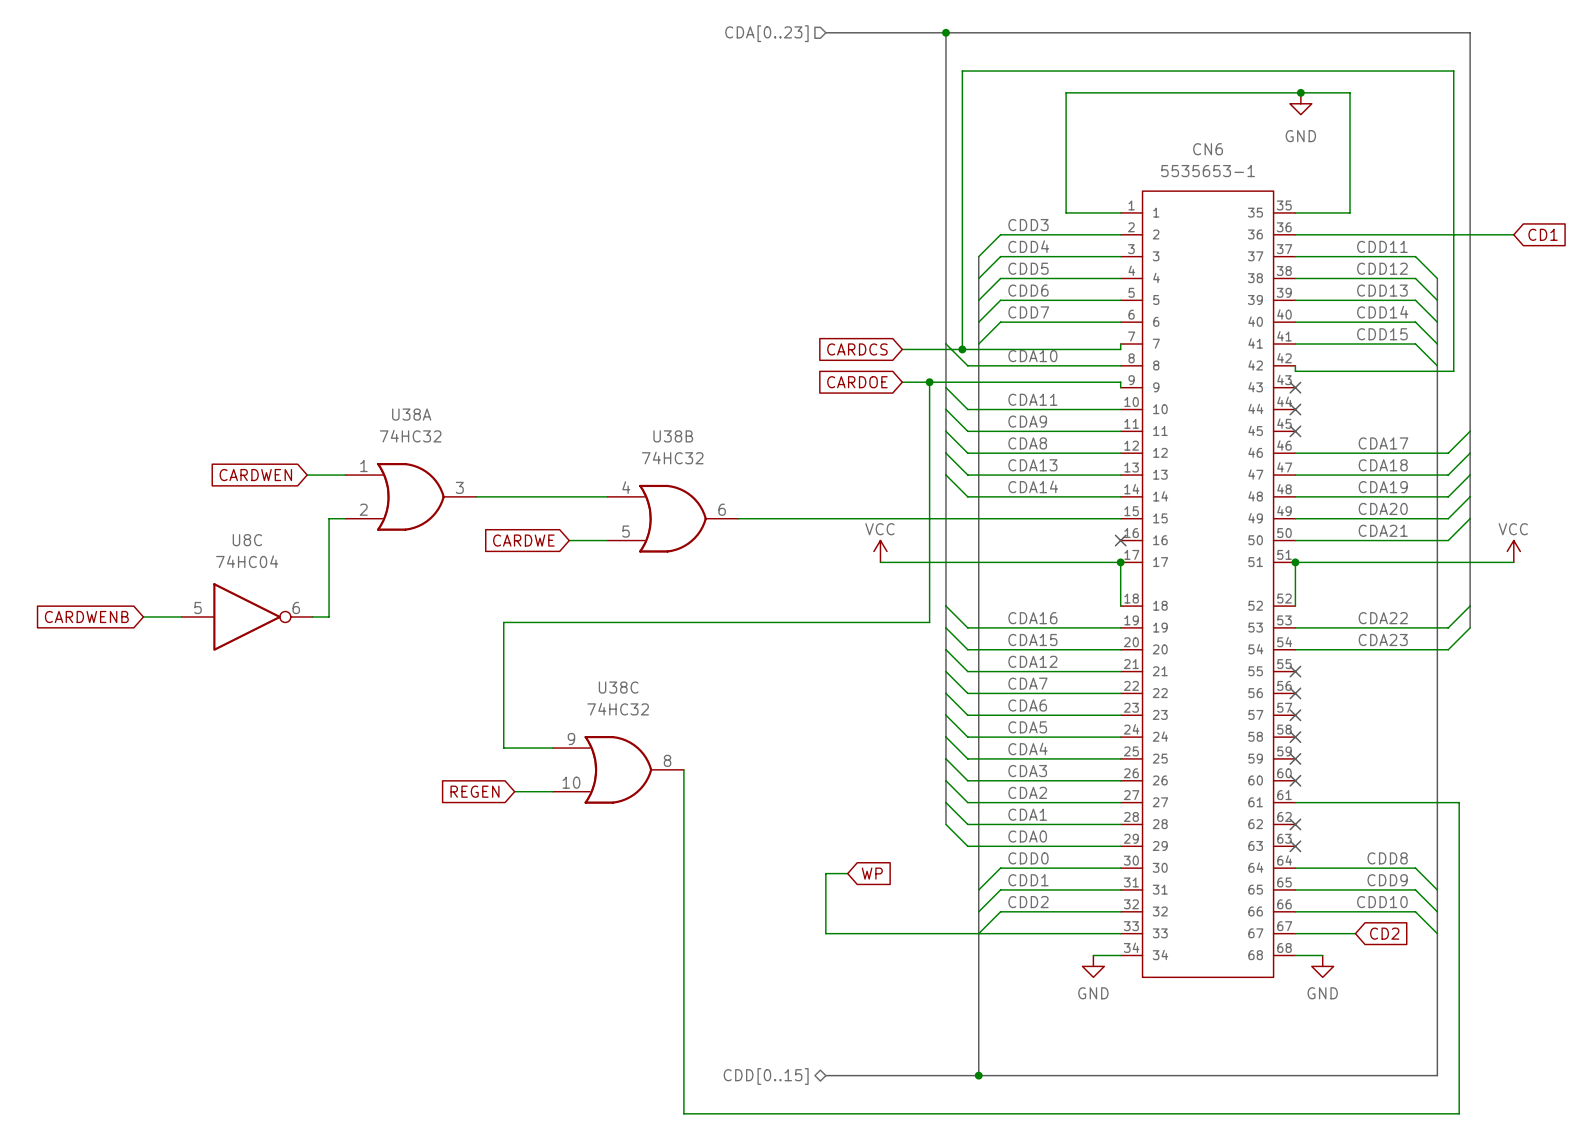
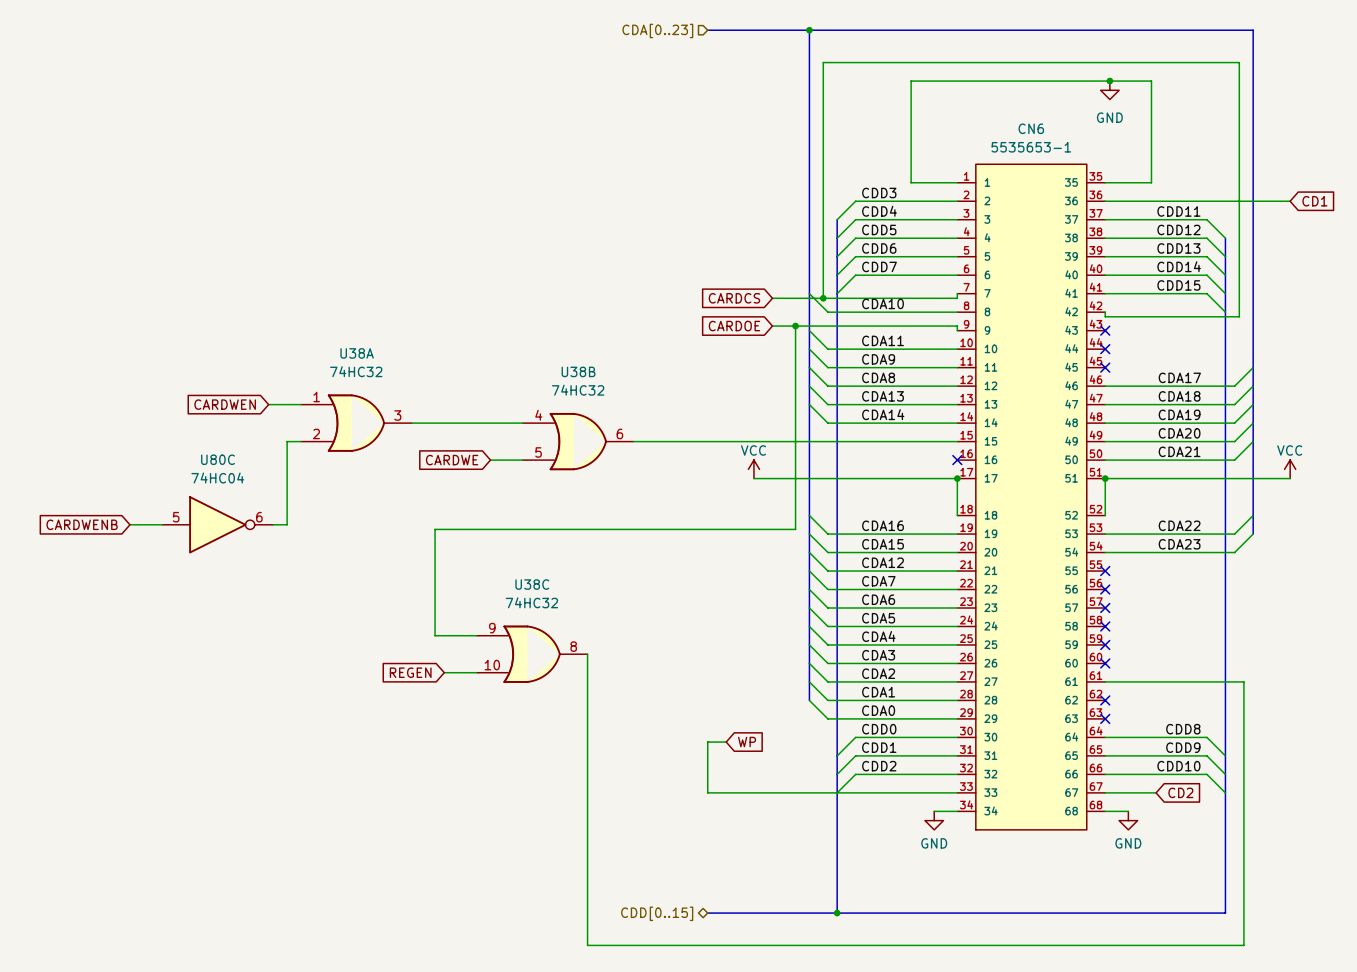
U8C name: U8C (247, 540) -> U80C (218, 459)

